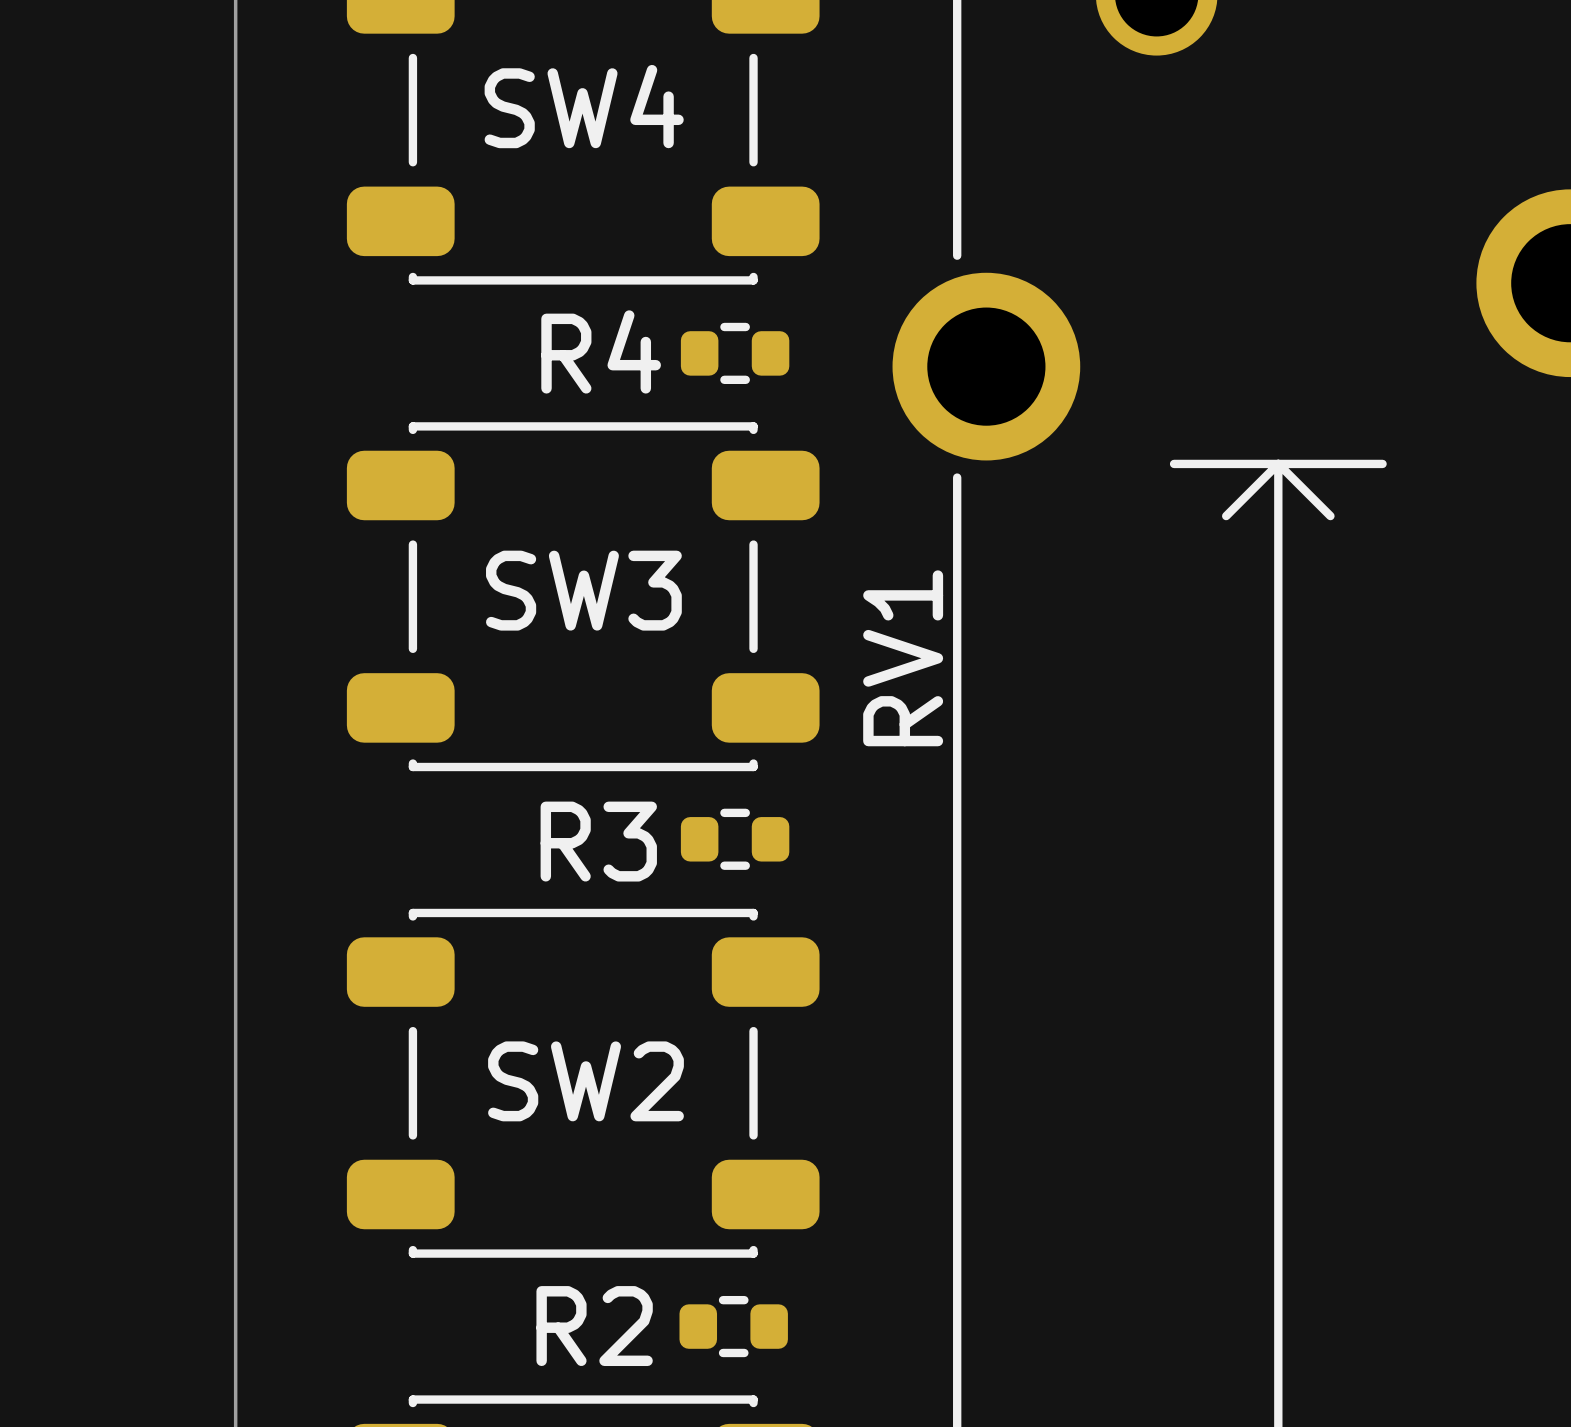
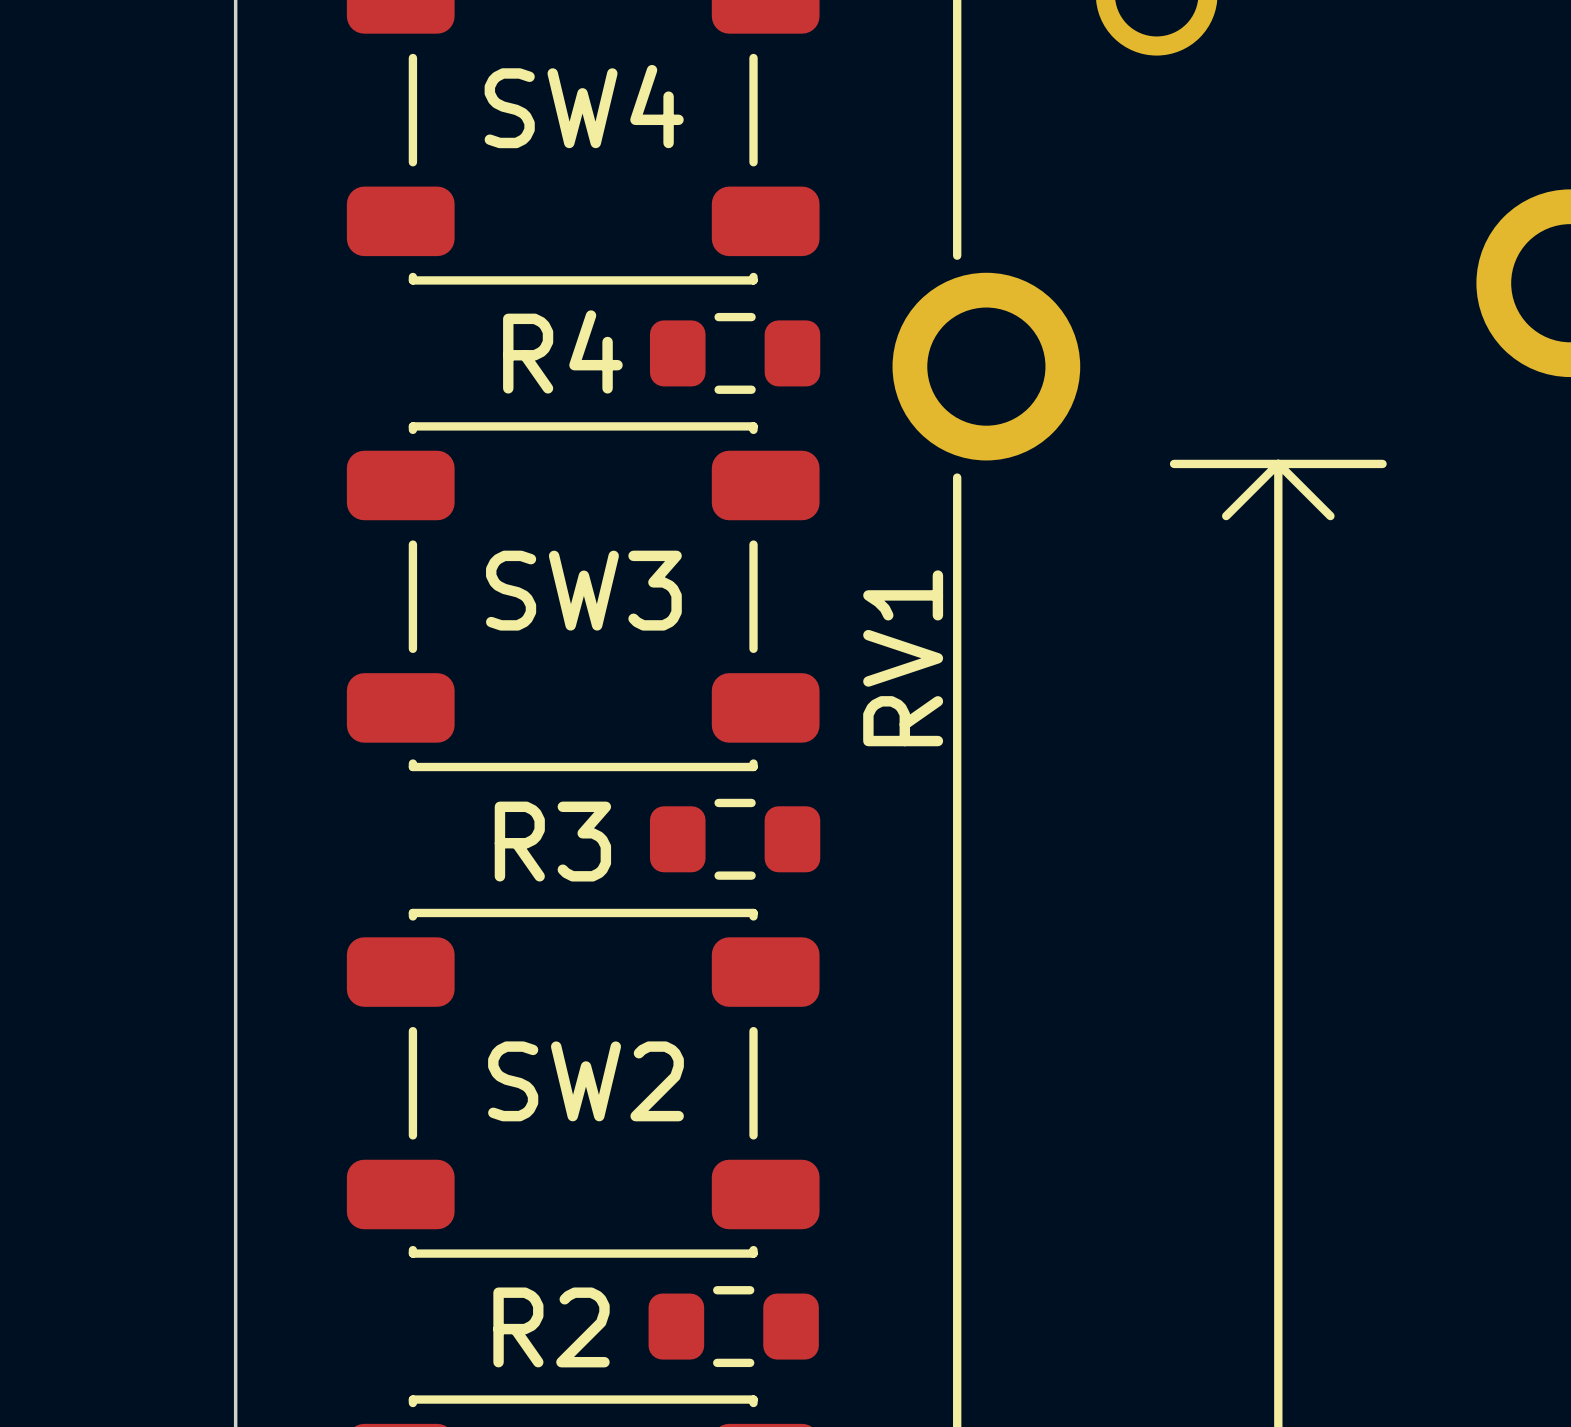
R4 footprint: [680, 322, 790, 385] -> [649, 312, 821, 394]
R4 name position: R4 (601, 351) -> R4 (562, 351)
R3 footprint: [680, 808, 790, 870] -> [649, 798, 821, 880]
R3 name position: R3 (598, 841) -> R3 (552, 841)
R2 footprint: [679, 1295, 788, 1358] -> [648, 1286, 819, 1368]
R2 name position: R2 (594, 1326) -> R2 (551, 1327)

